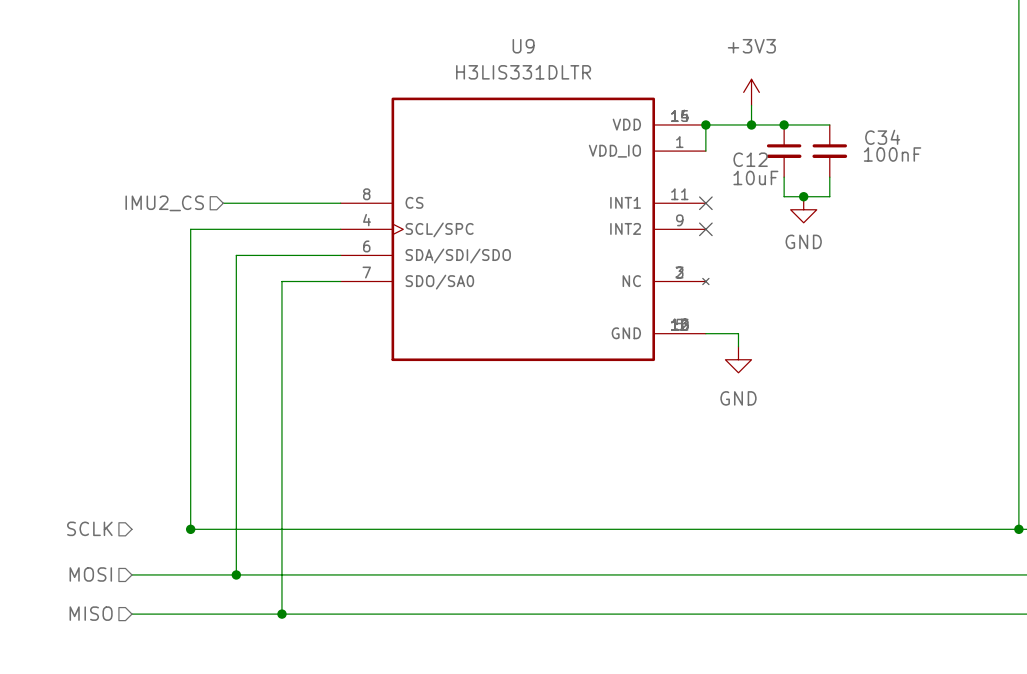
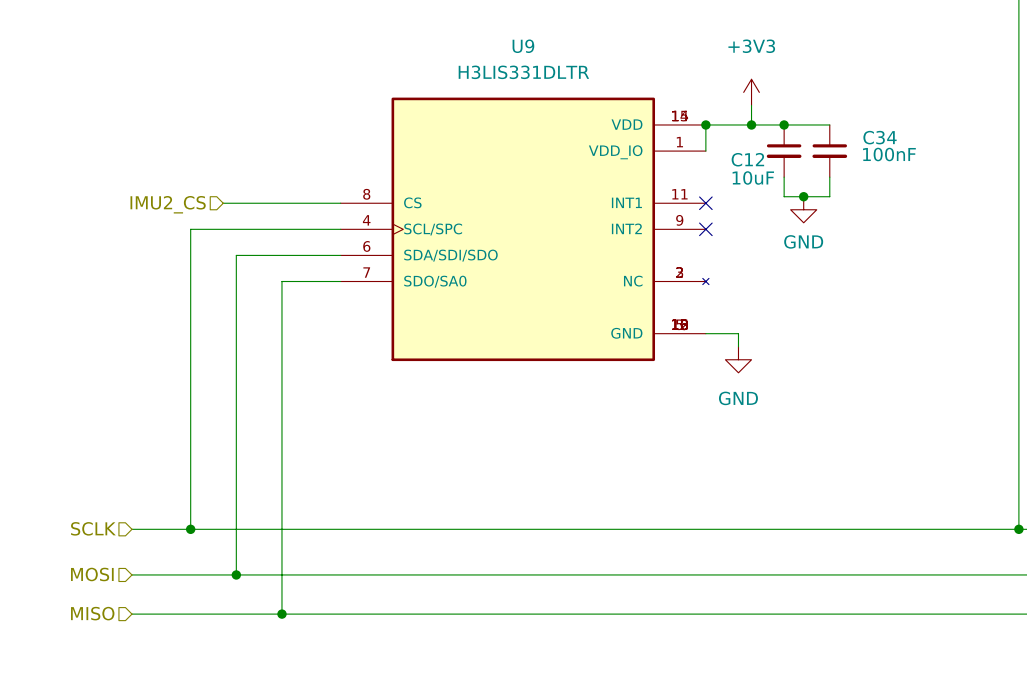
wire: none -> (131, 529) (190, 529)

